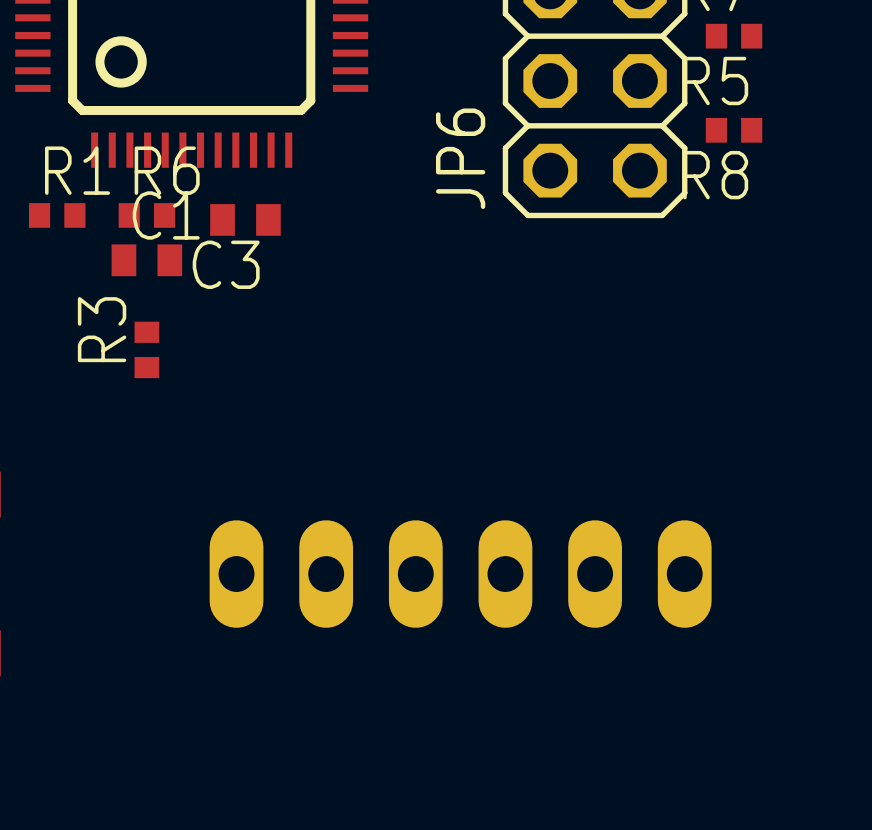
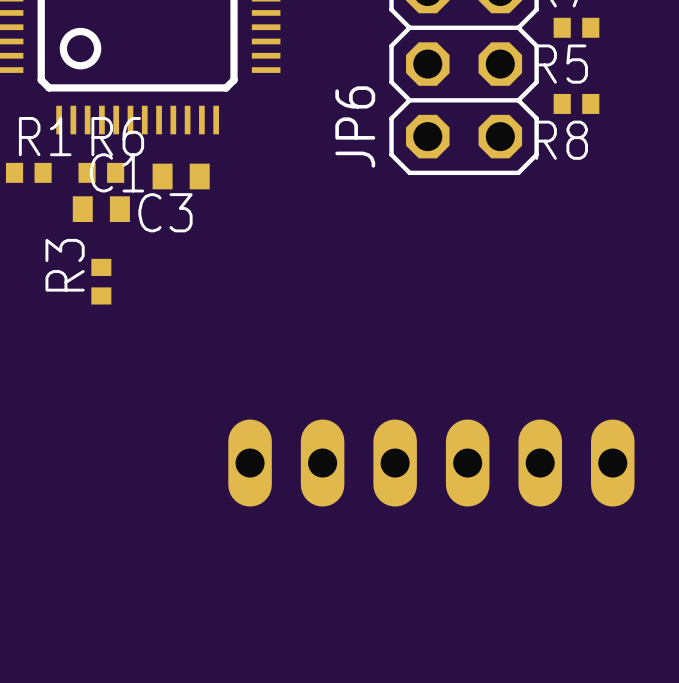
part position: (460, 574) -> (431, 463)

